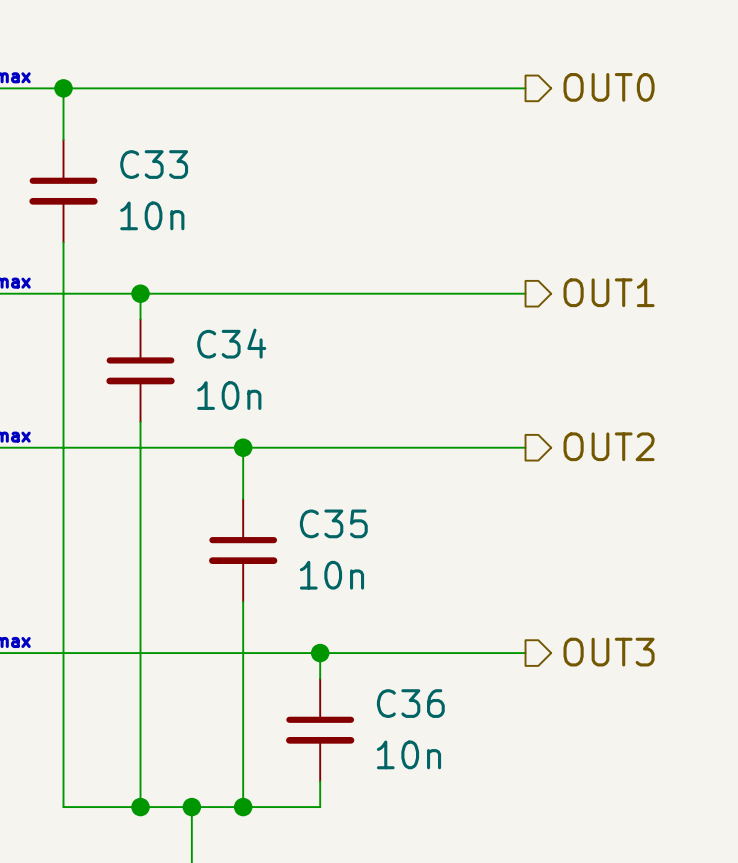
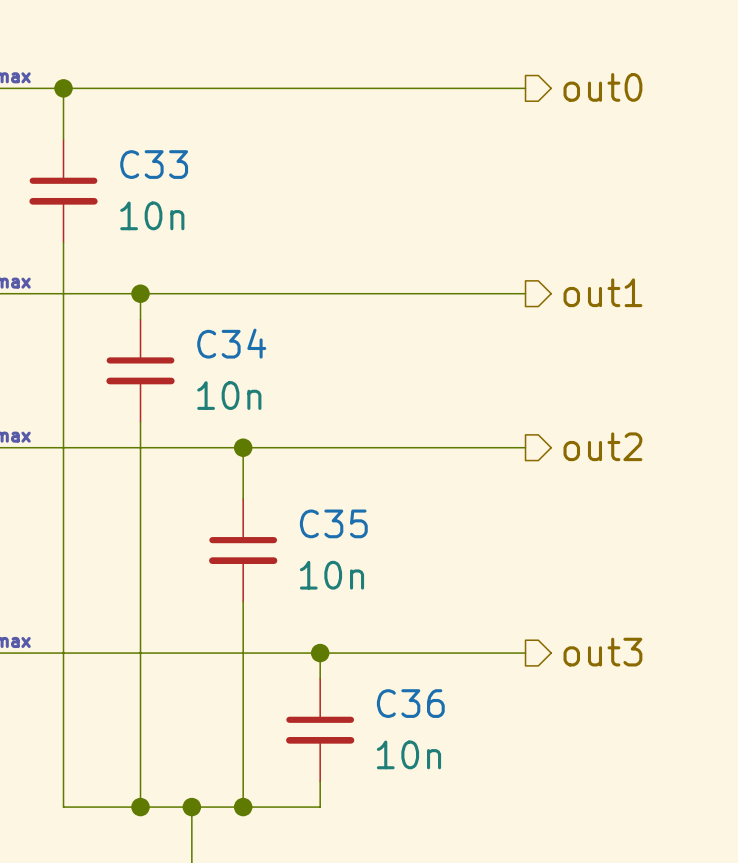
hierarchical label: OUT0 (609, 87) -> out0 (602, 87)
hierarchical label: OUT1 (609, 292) -> out1 (602, 292)
hierarchical label: OUT2 (609, 446) -> out2 (602, 446)
hierarchical label: OUT3 (609, 652) -> out3 (602, 652)

